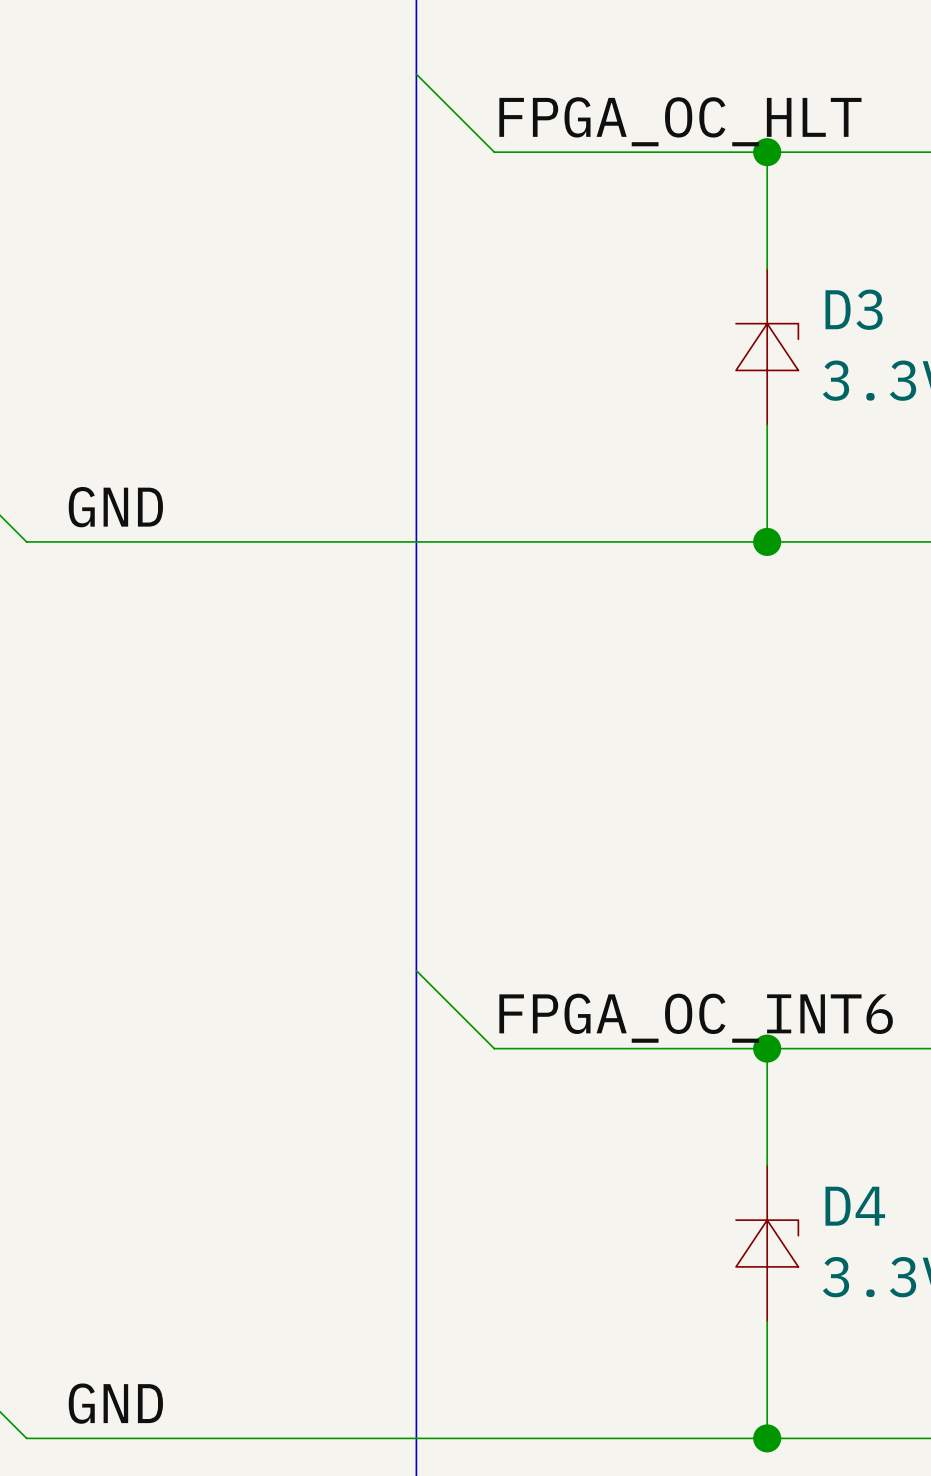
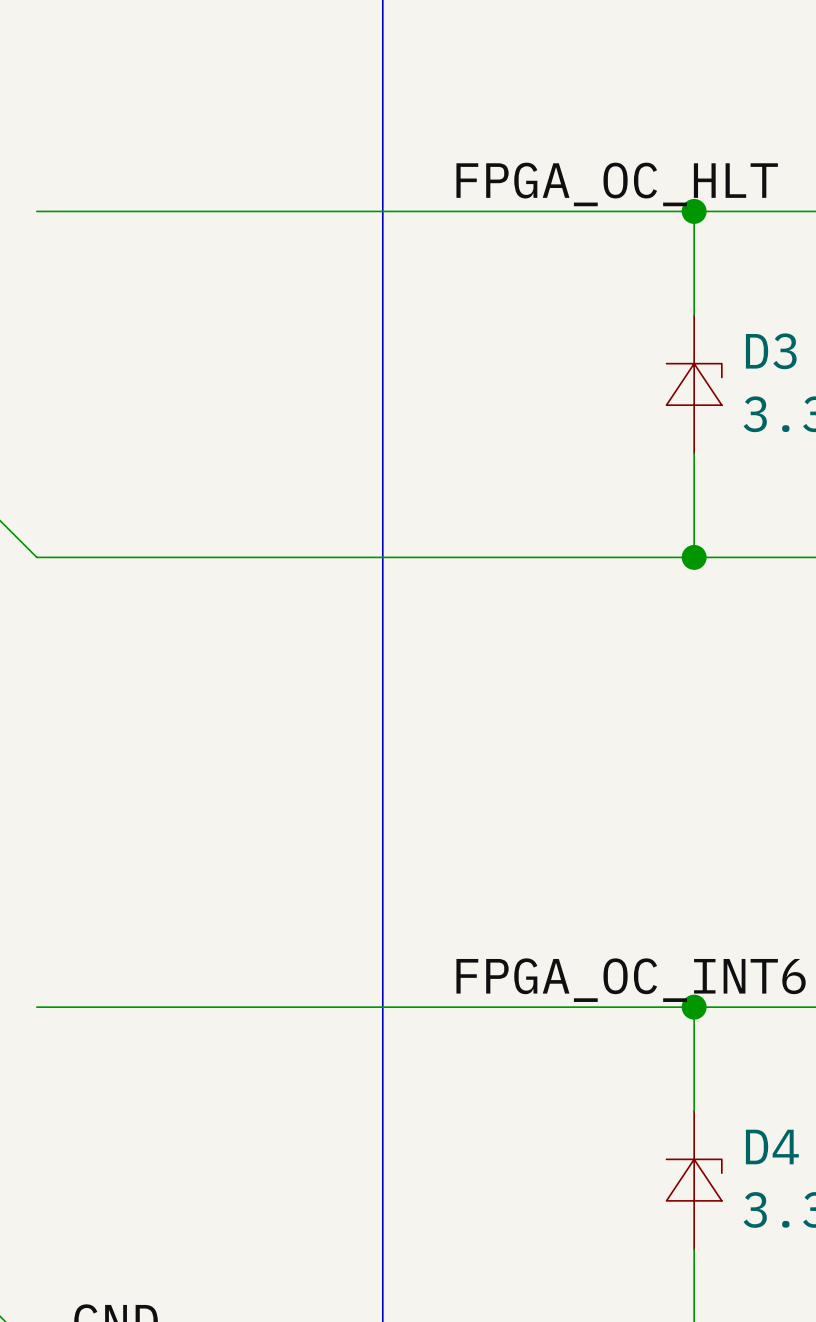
wire: (416, 74) (494, 152) -> (36, 211) (451, 211)
label: GND (115, 507) -> none
wire: (416, 970) (494, 1048) -> (36, 1007) (451, 1007)

